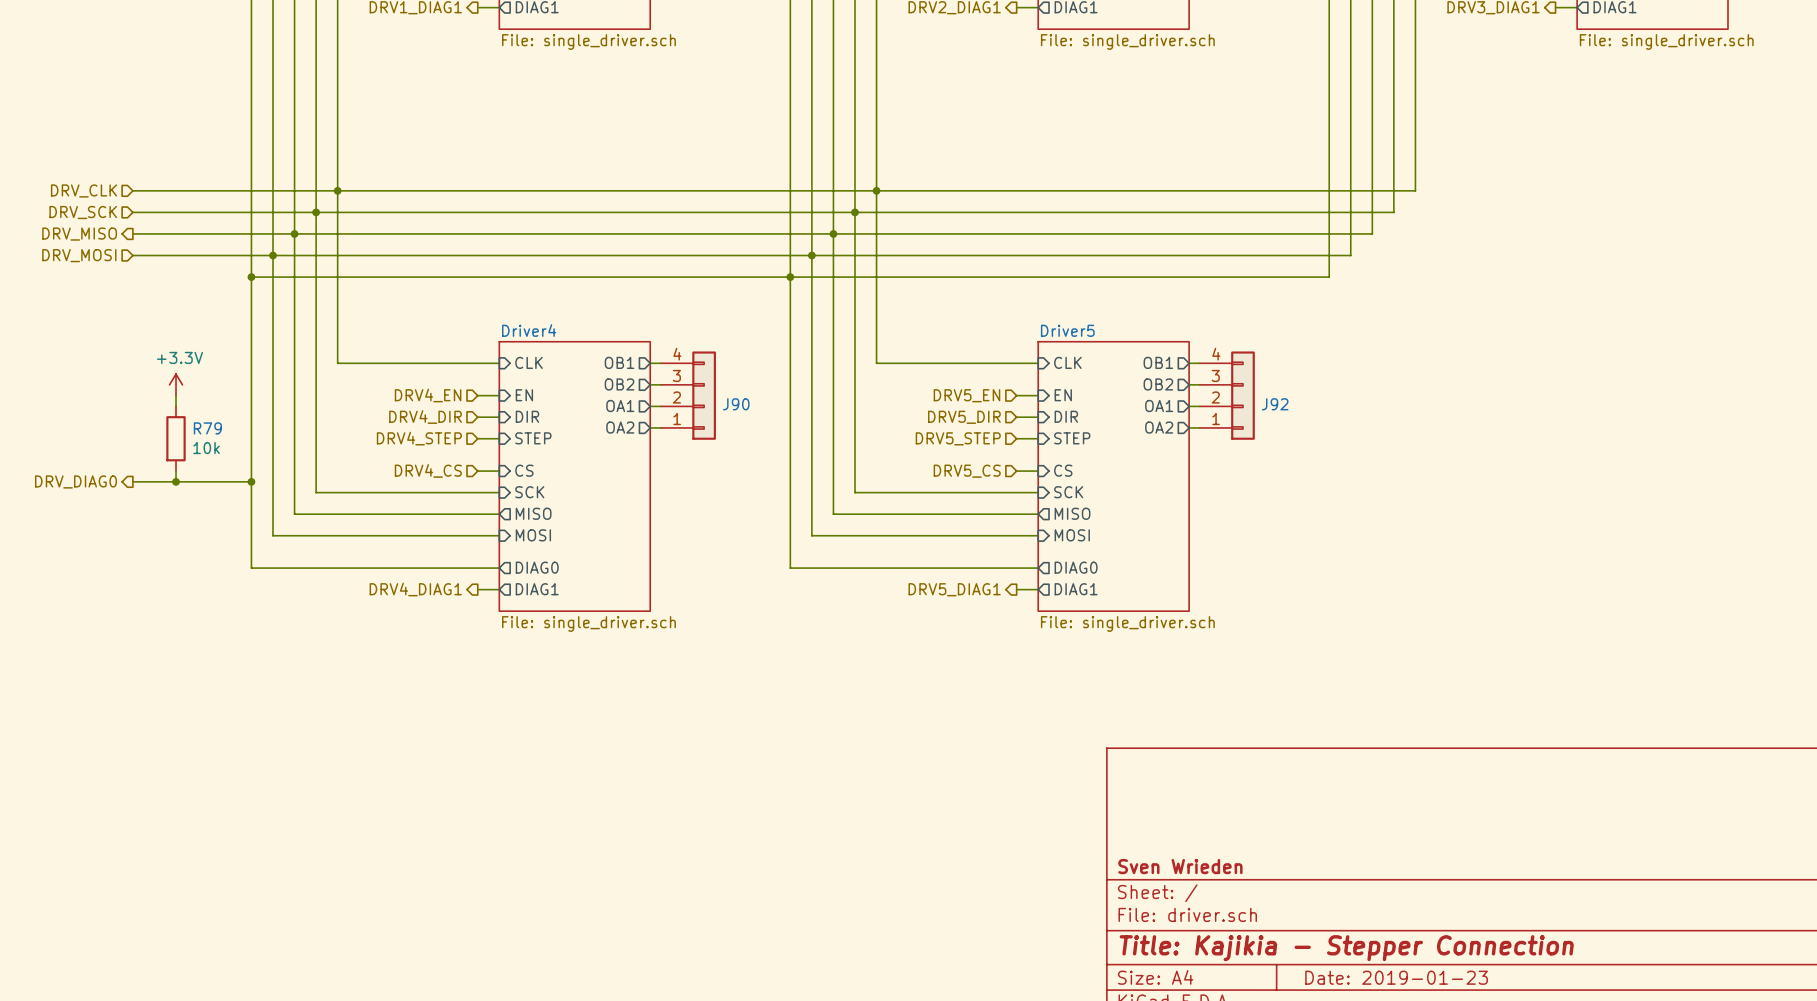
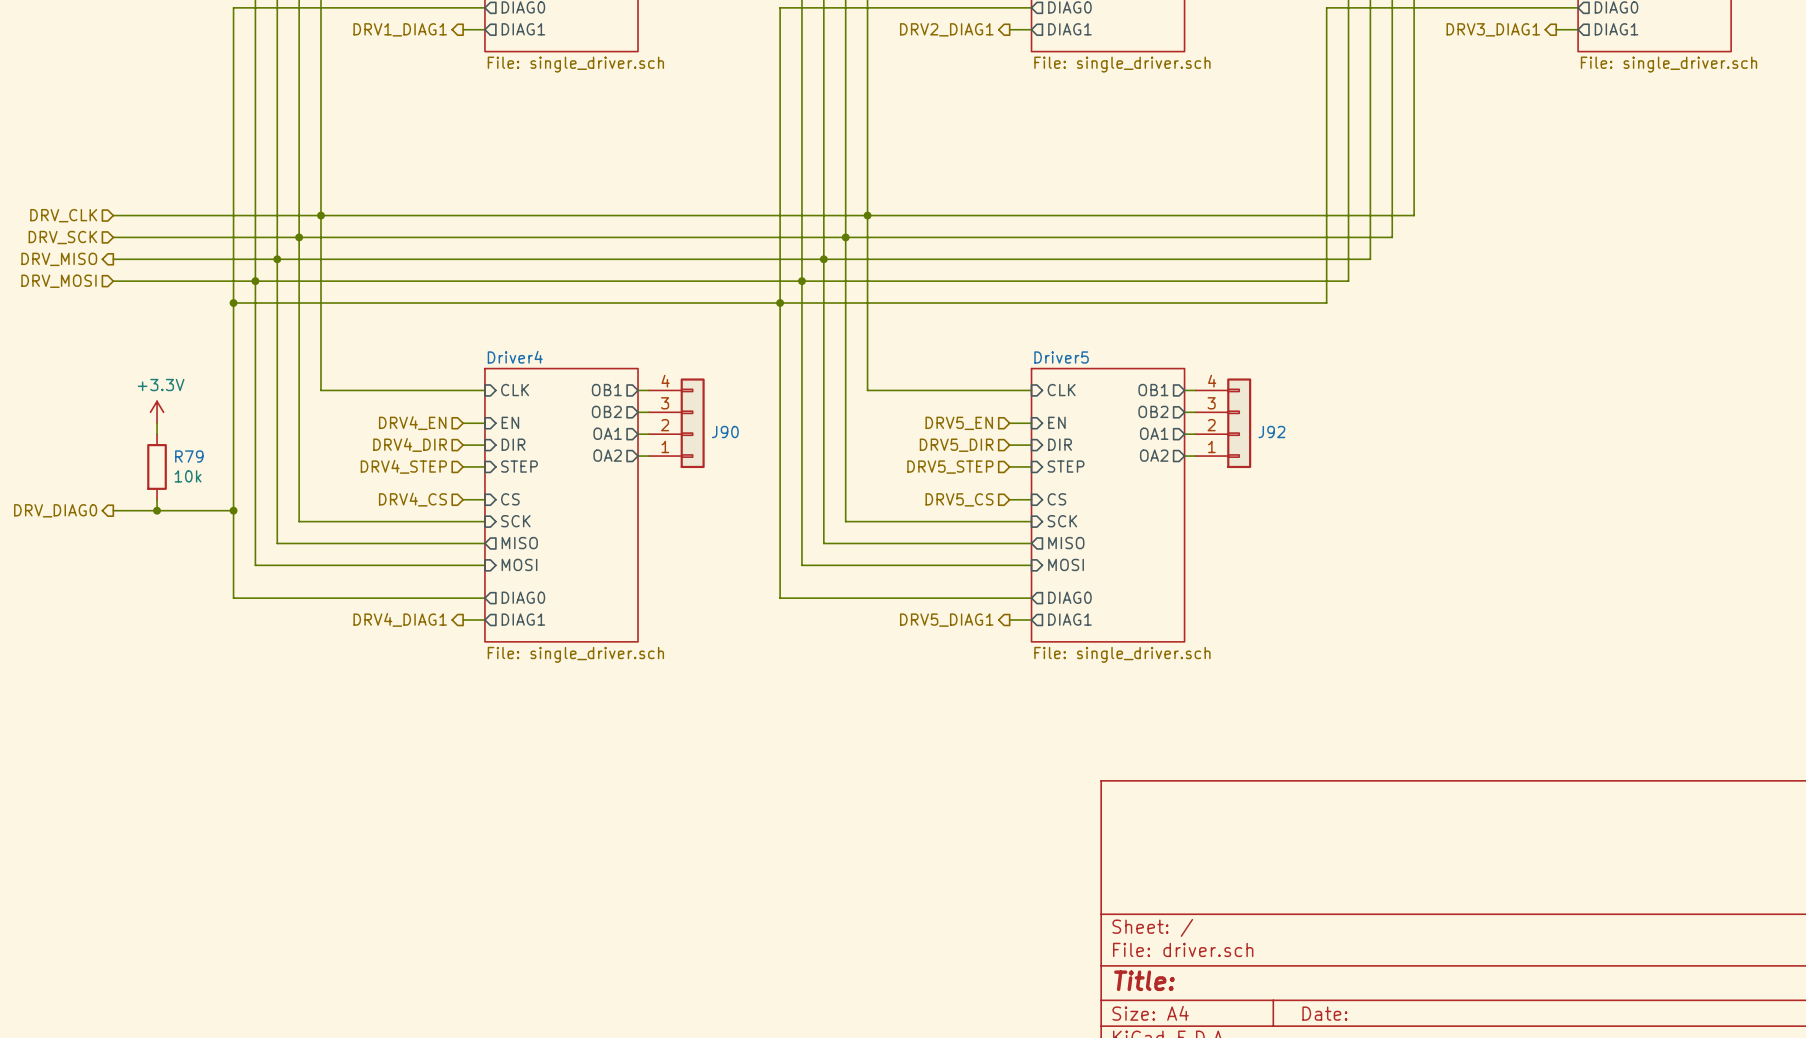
title block: Sven Wrieden (1180, 866) -> none
title block: Title: Kajikia - Stepper Connection (1346, 948) -> Title: (1144, 980)
title block: Date: 2019-01-23 (1396, 977) -> Date: (1324, 1013)

